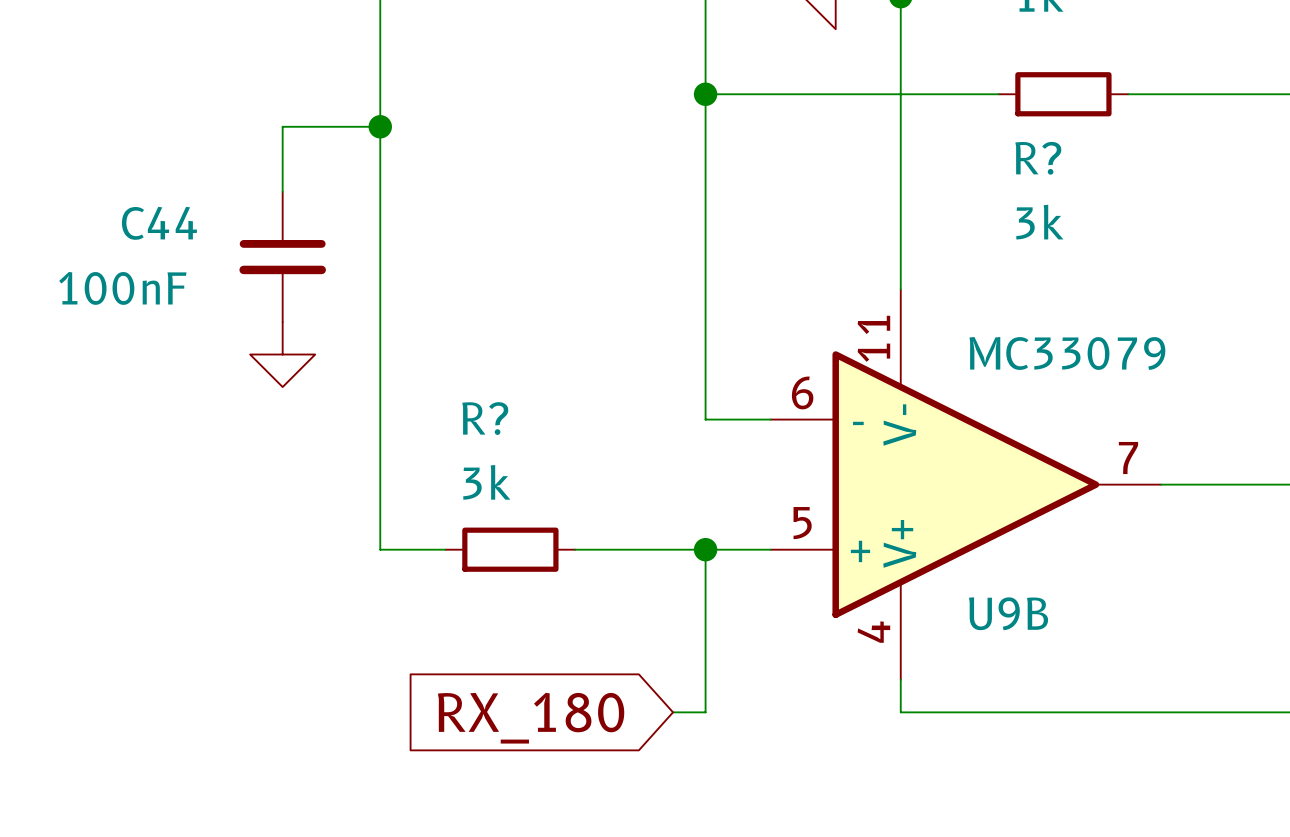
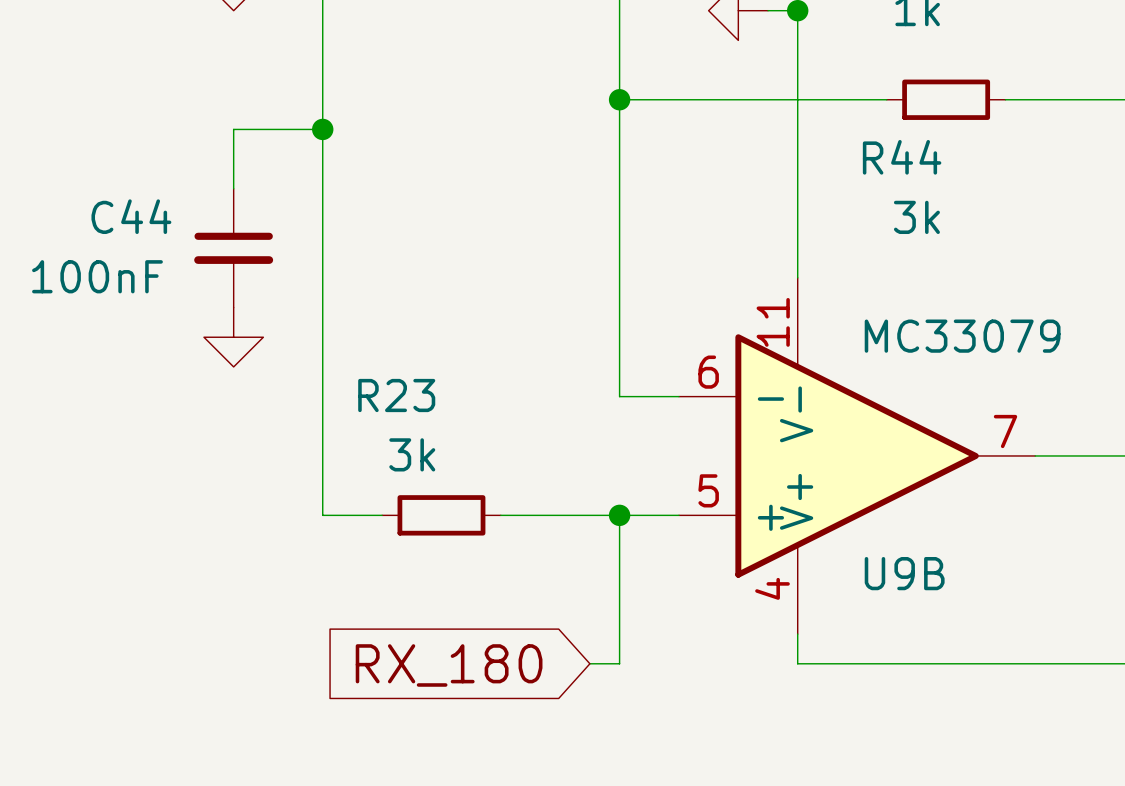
R? name: R? (1038, 158) -> R44 (902, 157)
R? name: R? (485, 418) -> R23 (396, 395)

